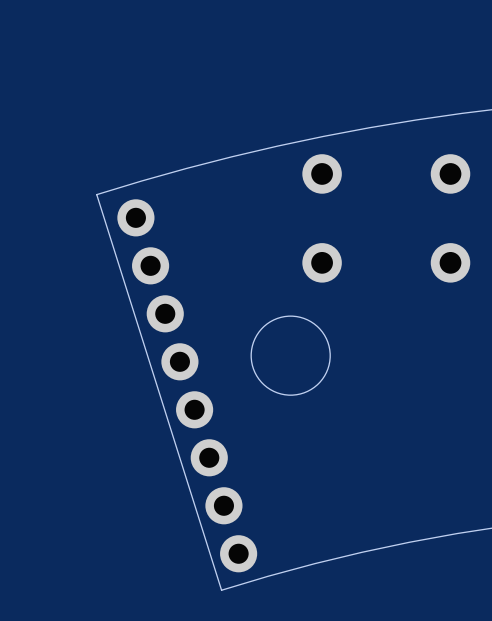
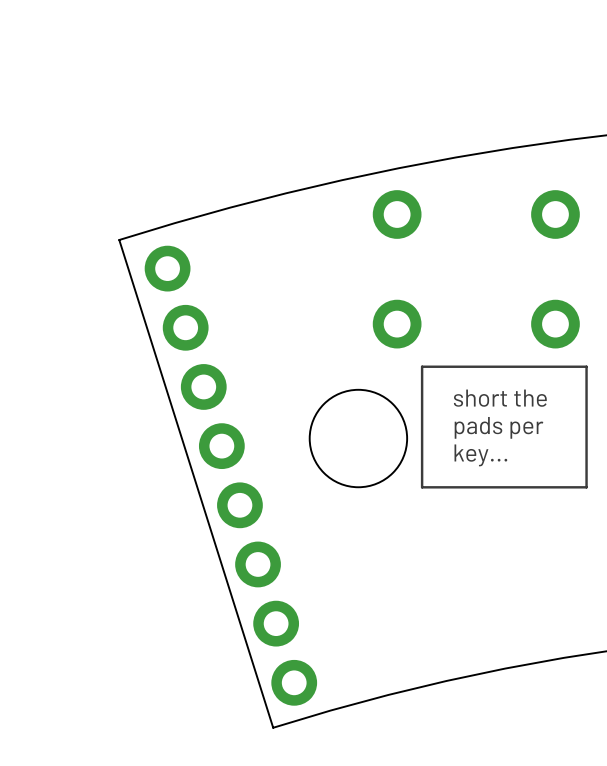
line: none -> (586, 366) (422, 366) (422, 487) (586, 487) (586, 366)
text: none -> short the (500, 398)
text: none -> pads per (498, 427)
text: none -> key... (480, 455)

